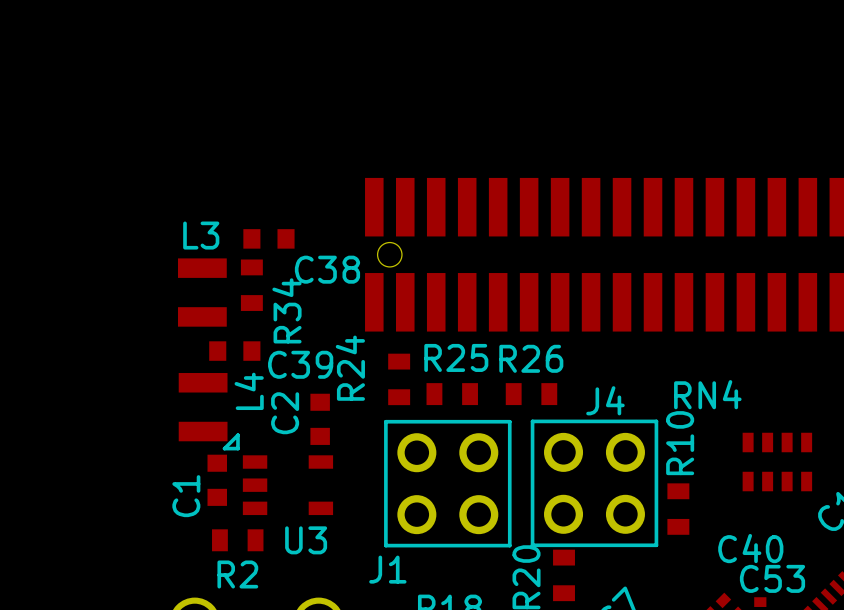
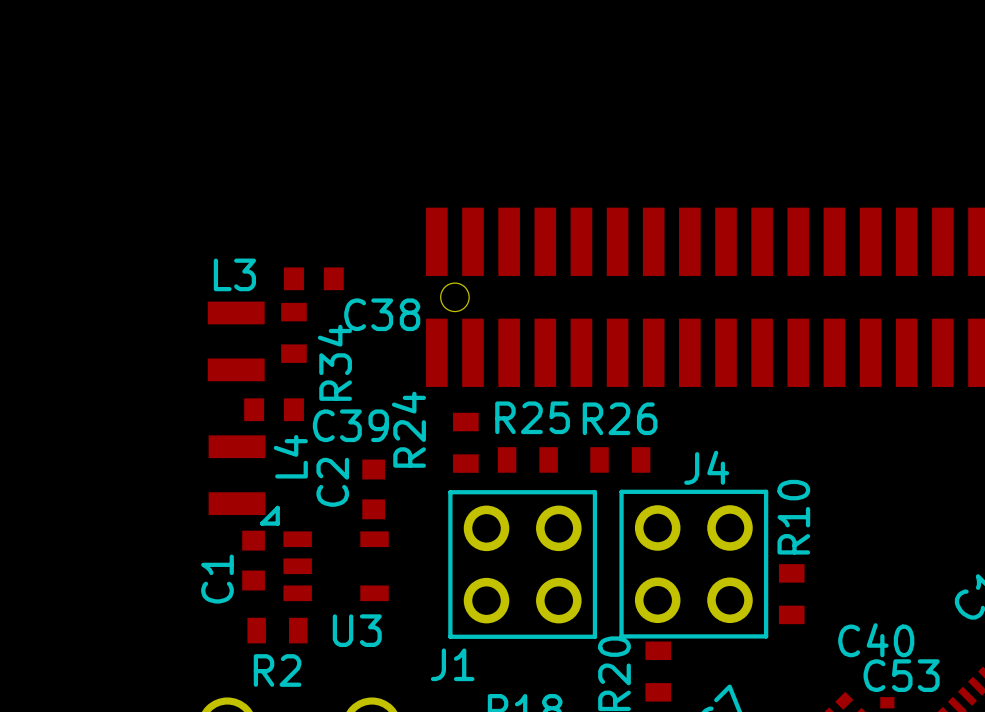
RN4: (777, 462) -> none

